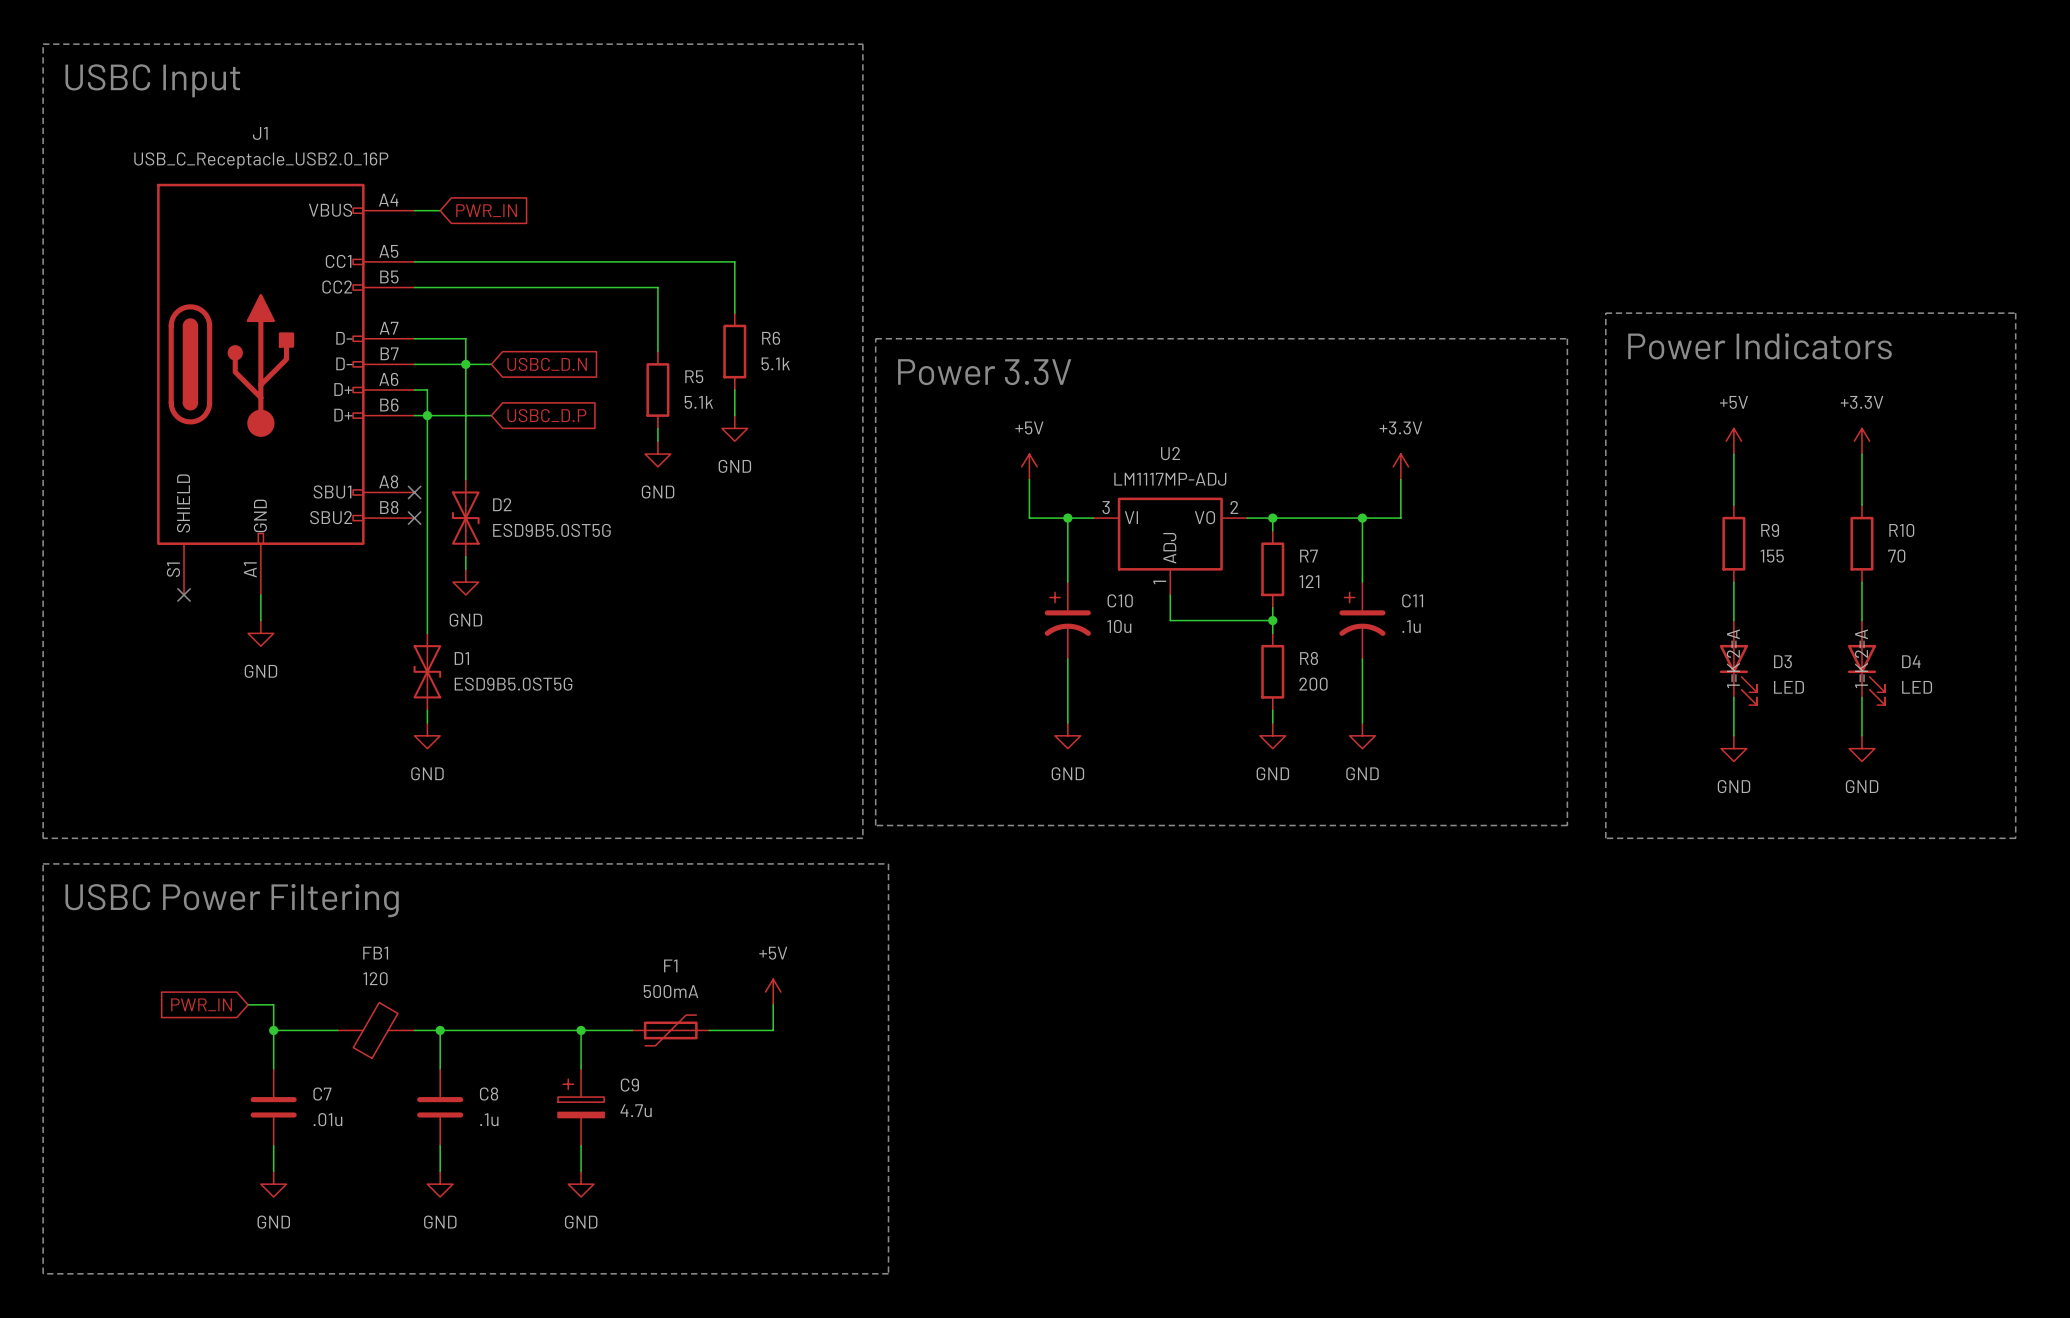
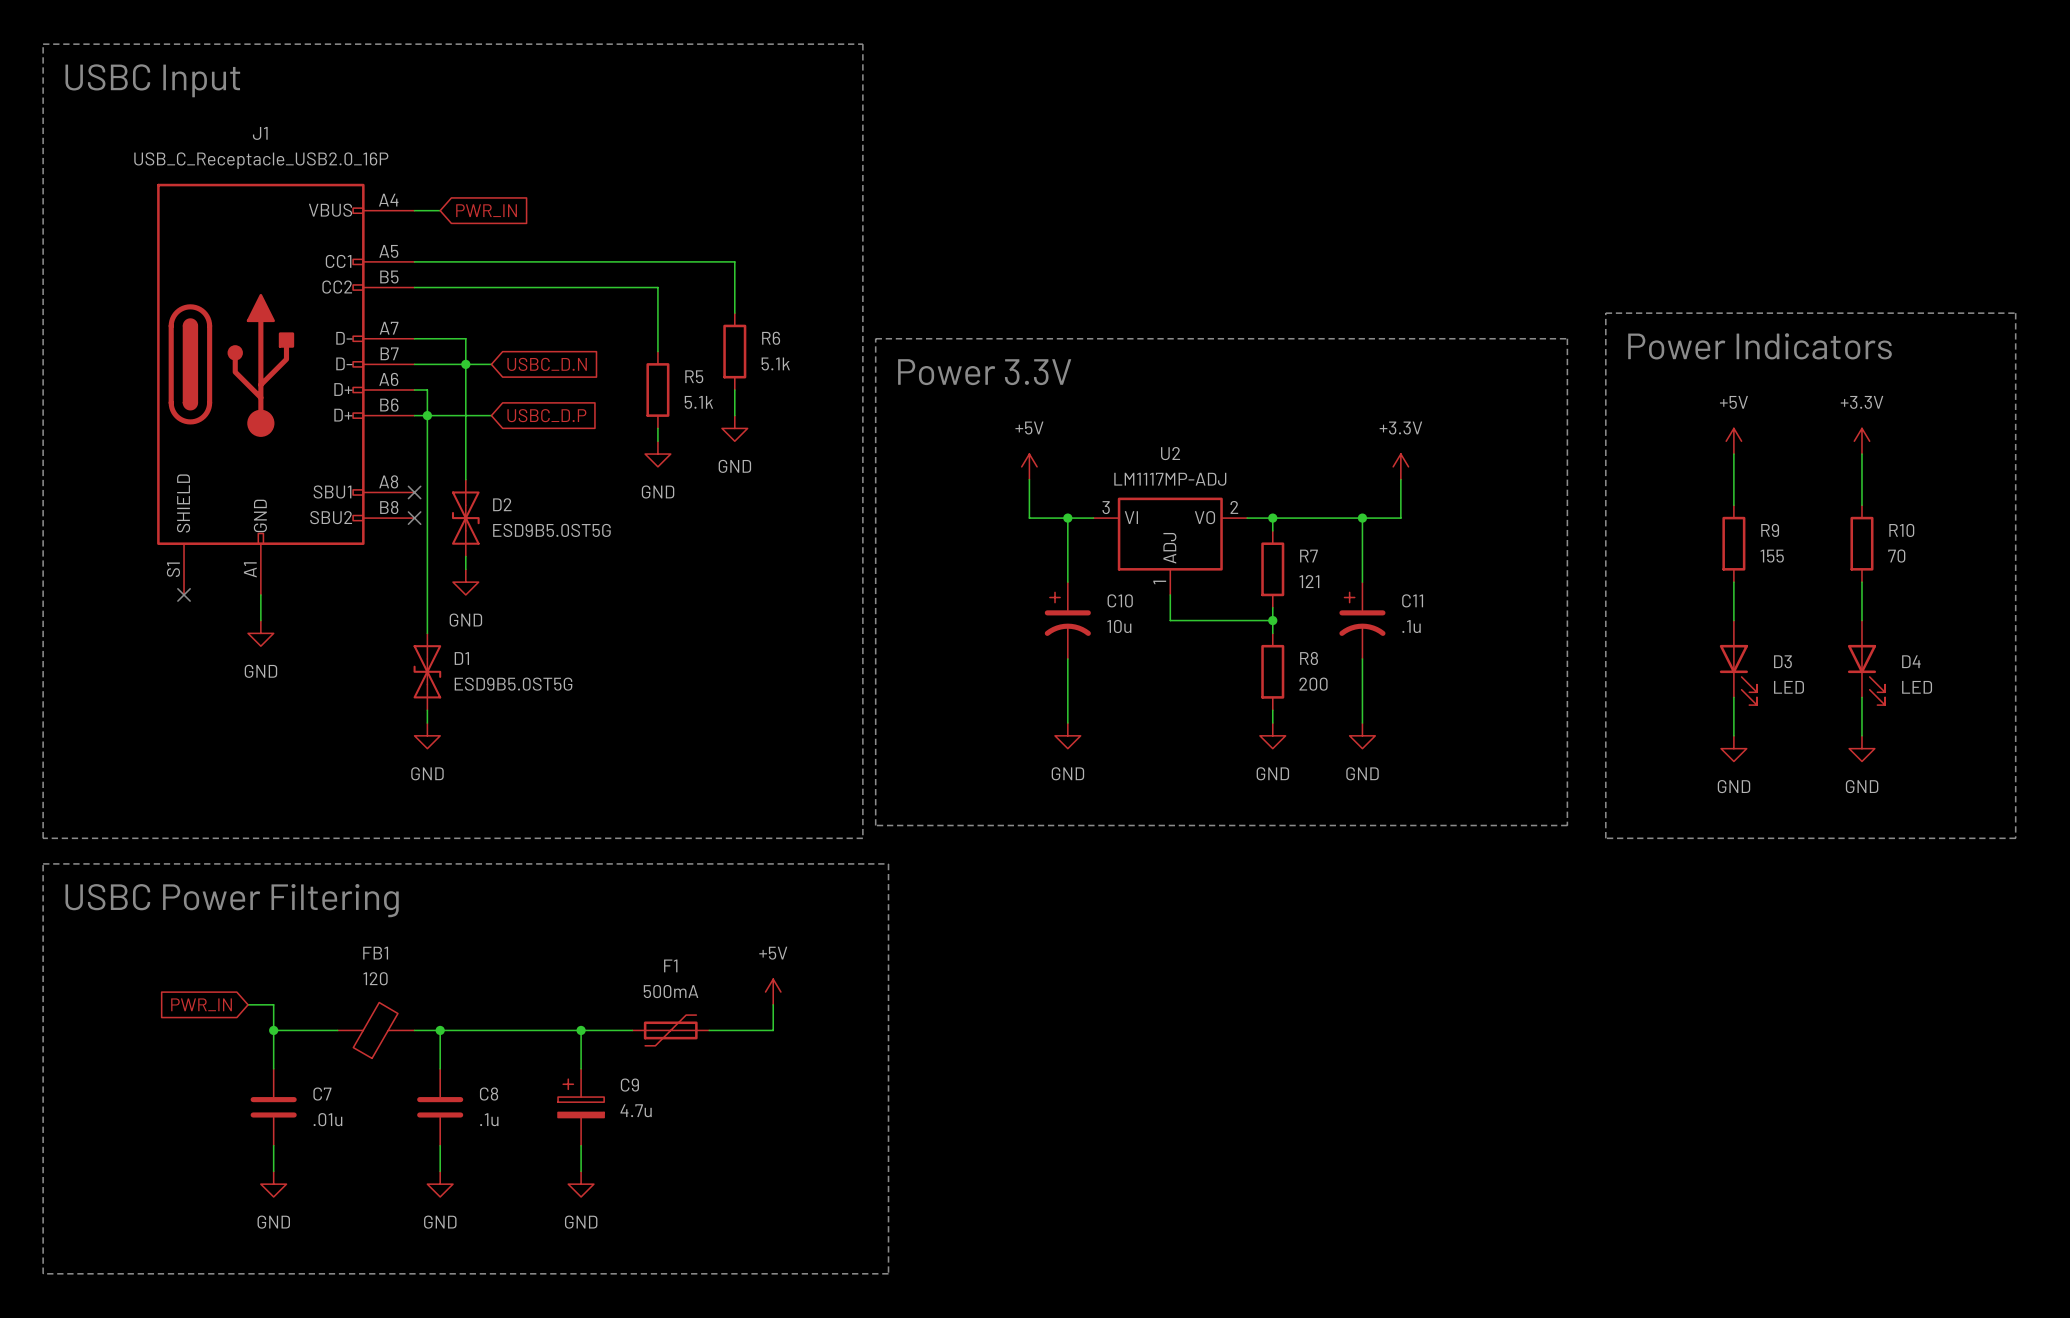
D3 text: 1=K 2=A (1733, 658) -> none
D4 text: 1=K 2=A (1861, 658) -> none

